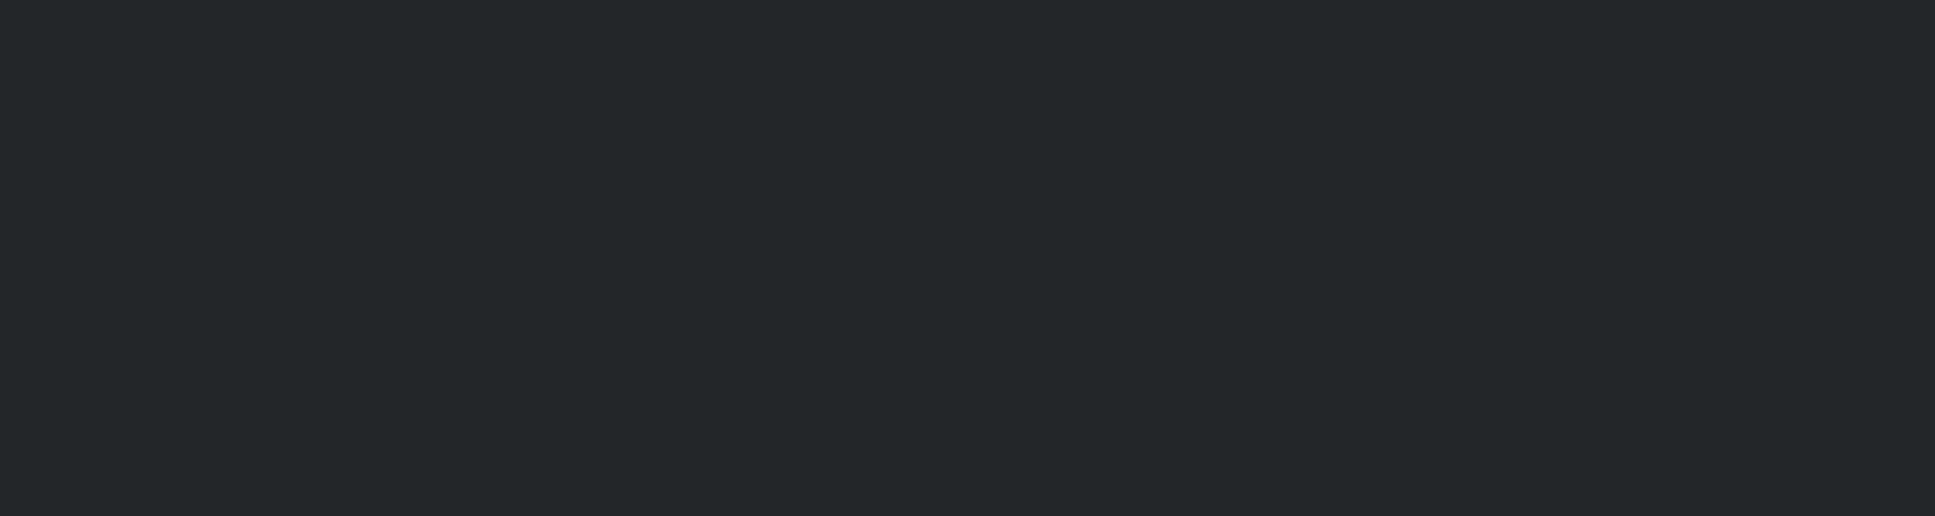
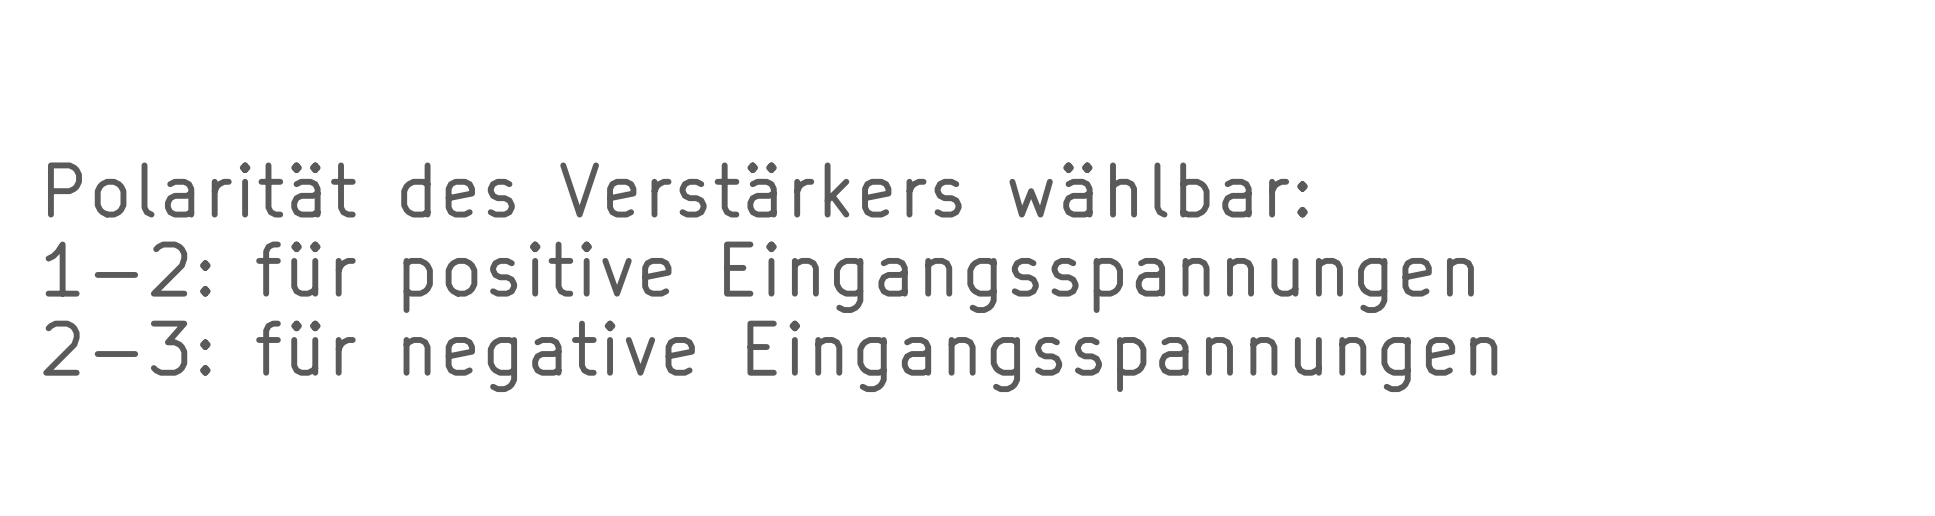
text: none -> Polarität des Verstärkers wählbar: (677, 189)
text: none -> 1-2: für positive Eingangsspannungen (759, 277)
text: none -> 2-3: für negative Eingangsspannungen (770, 356)

